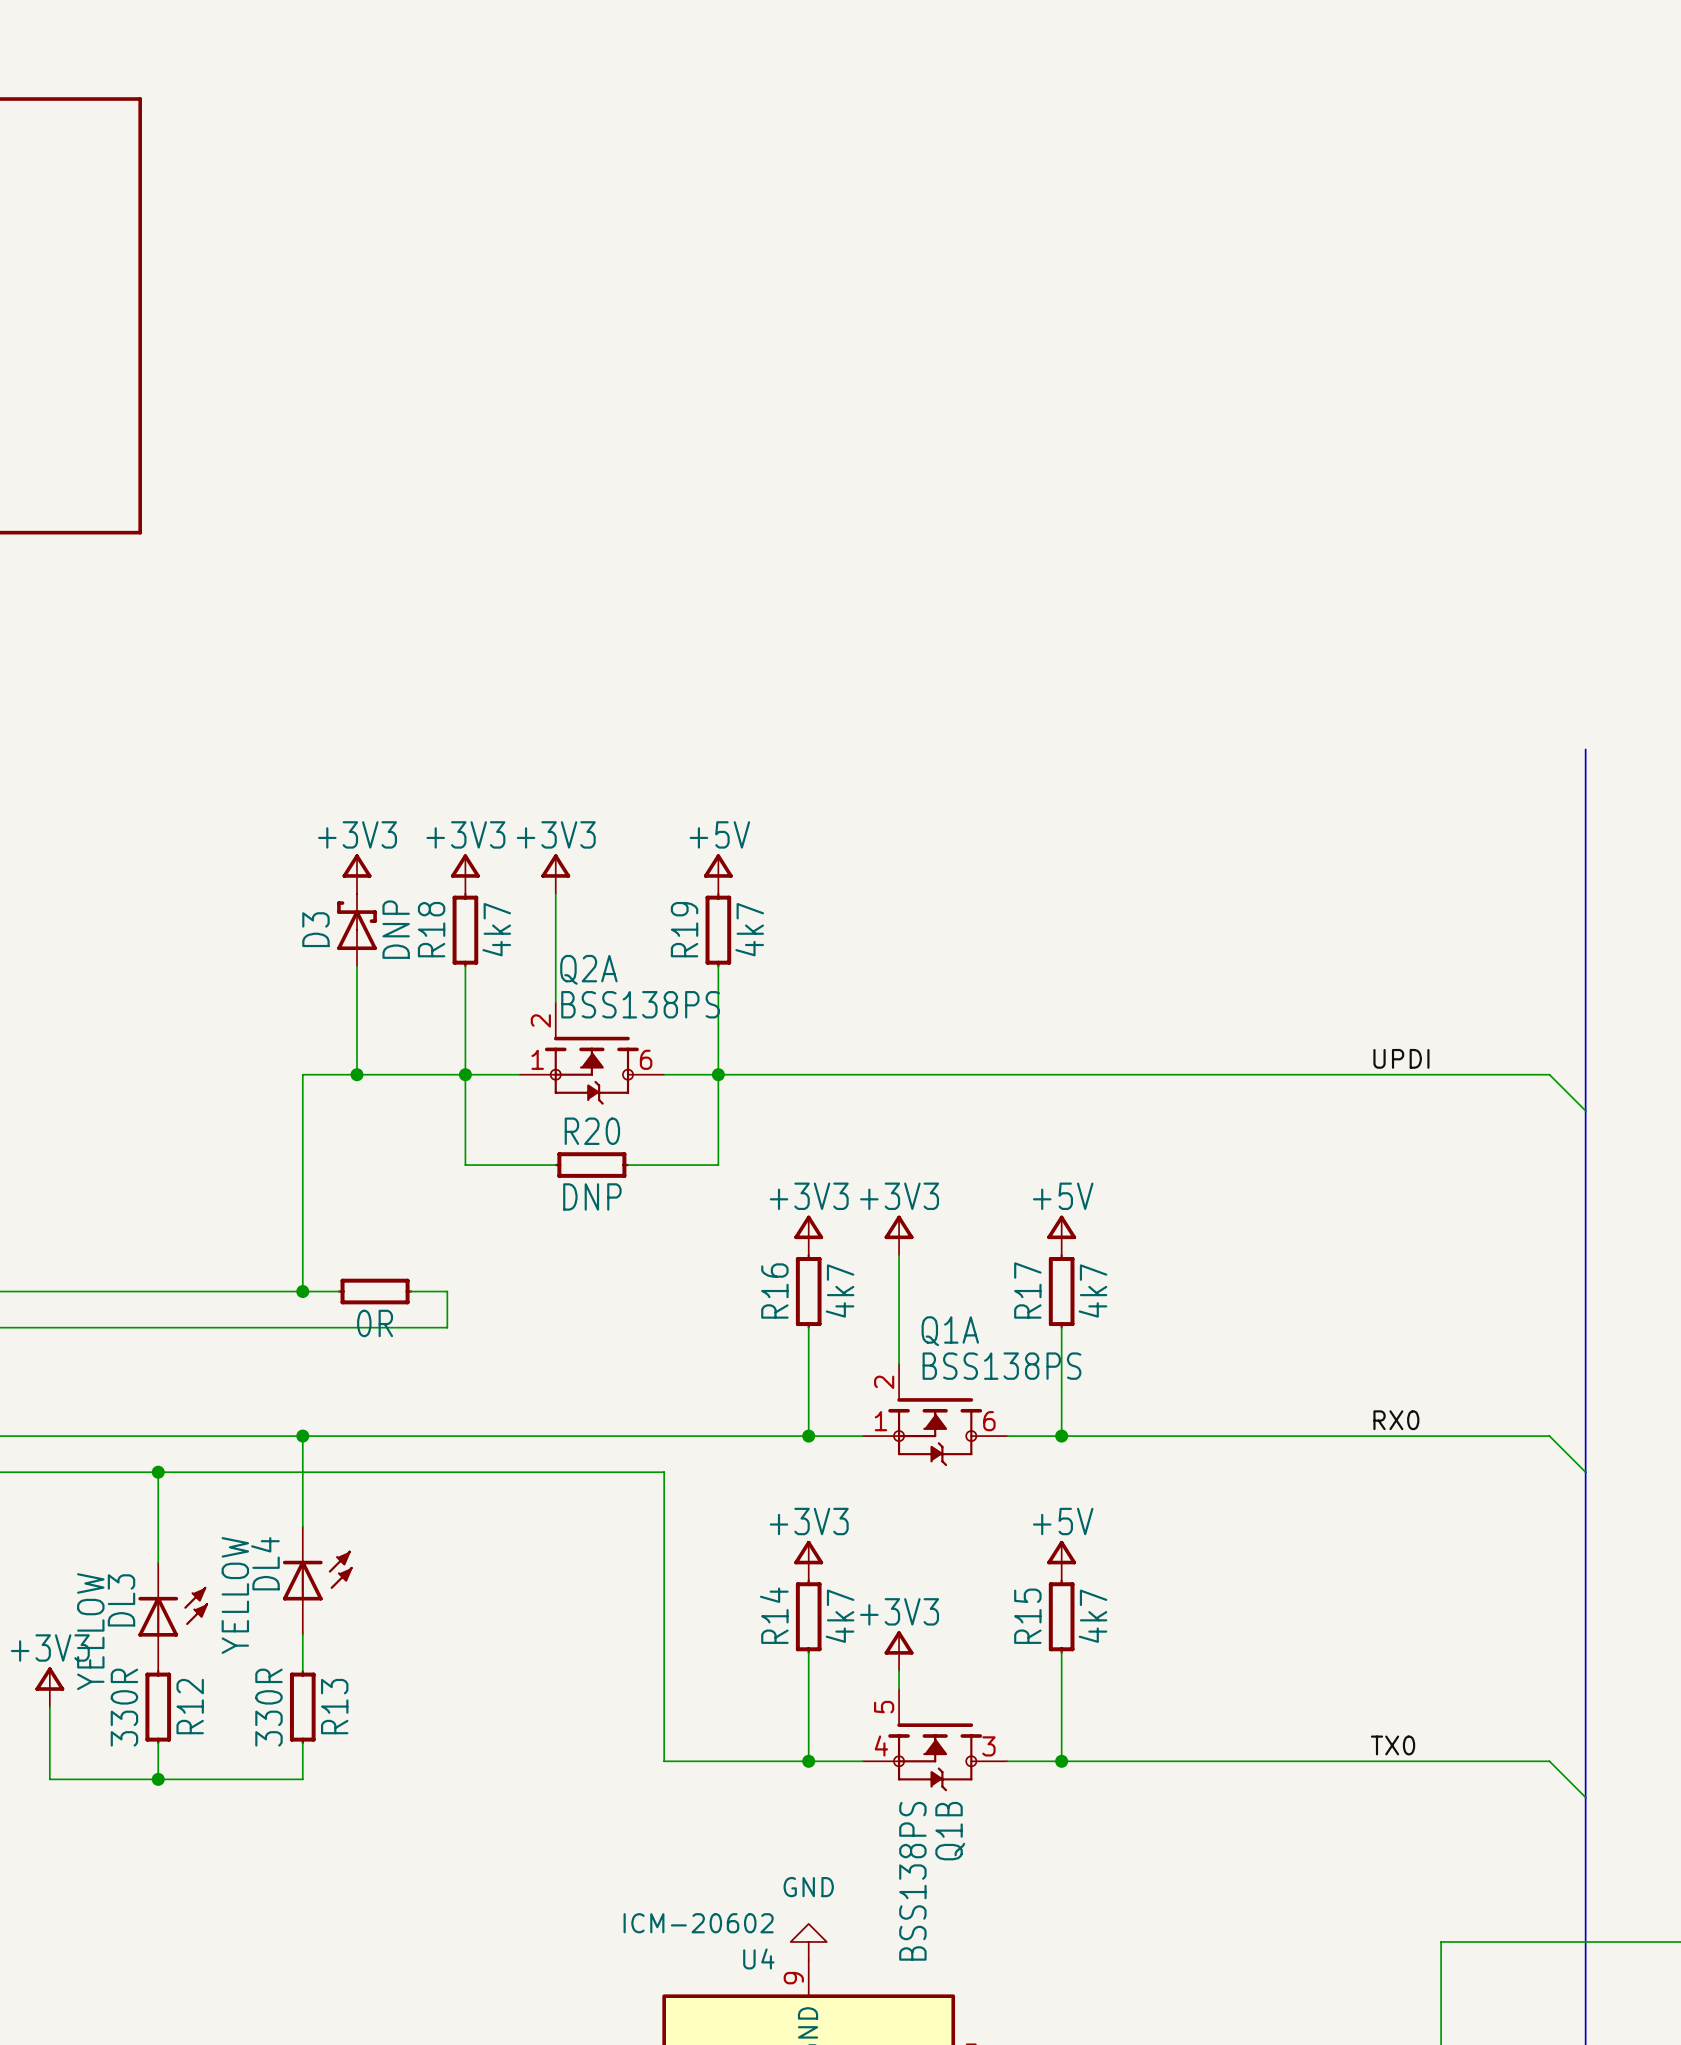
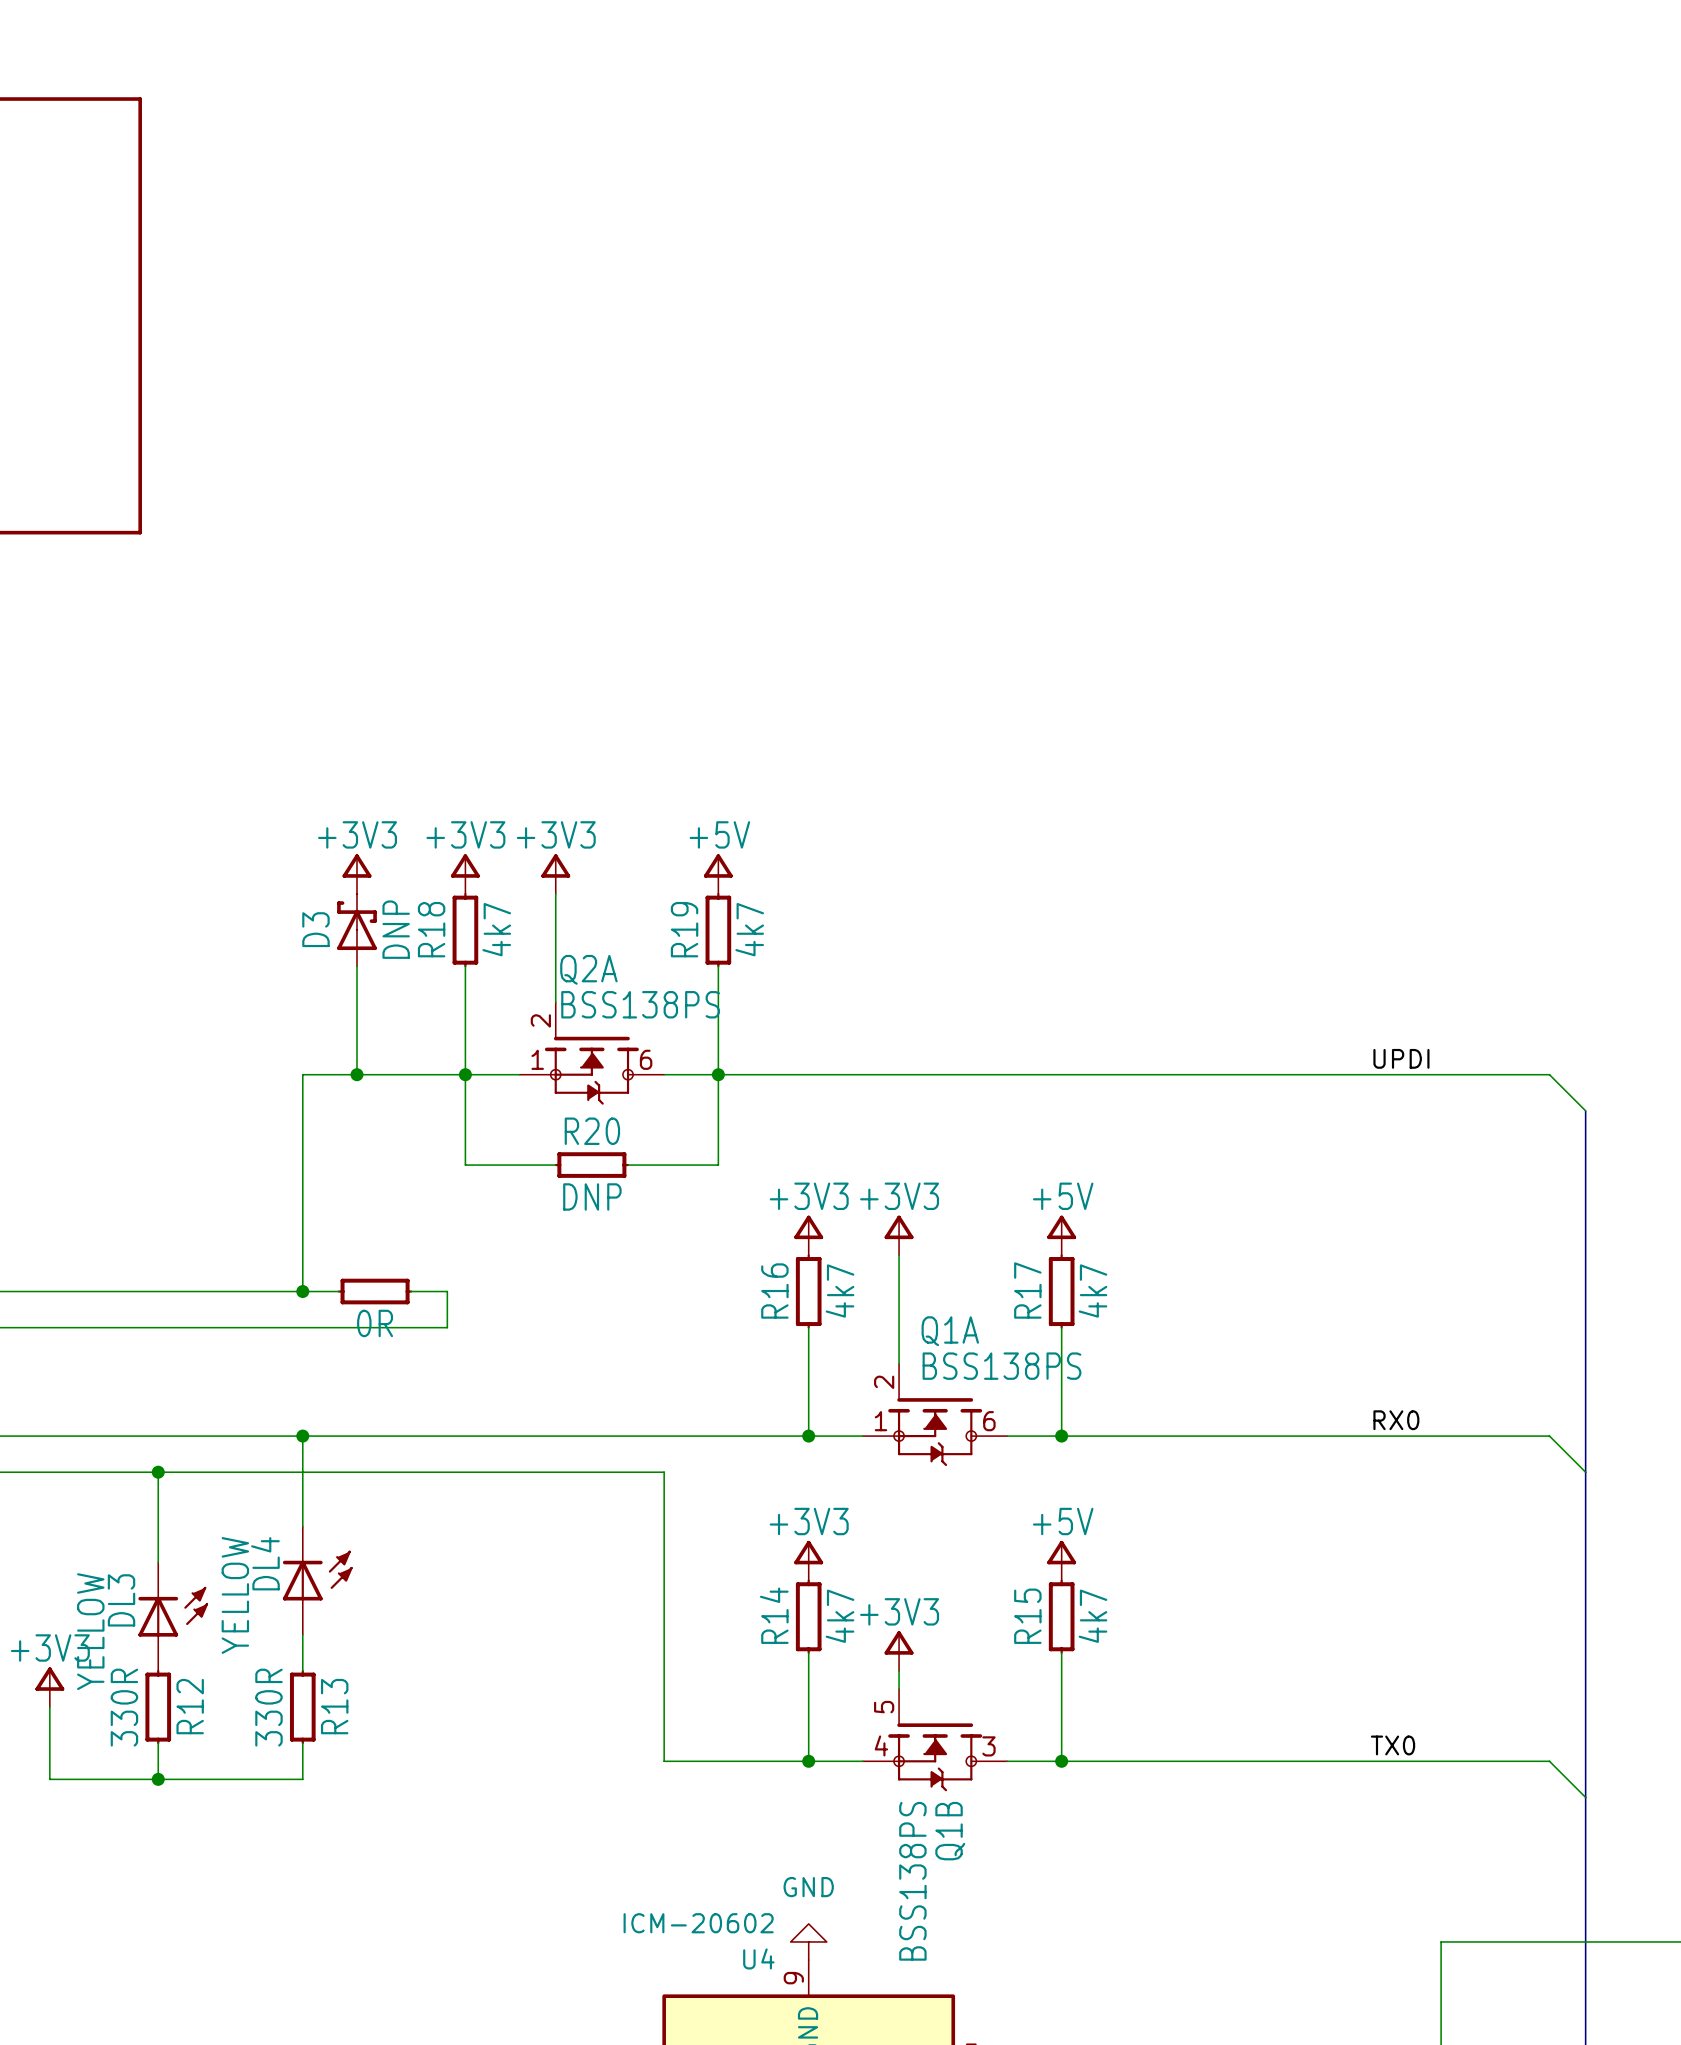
bus: (1585, 749) (1585, 1110) -> none

